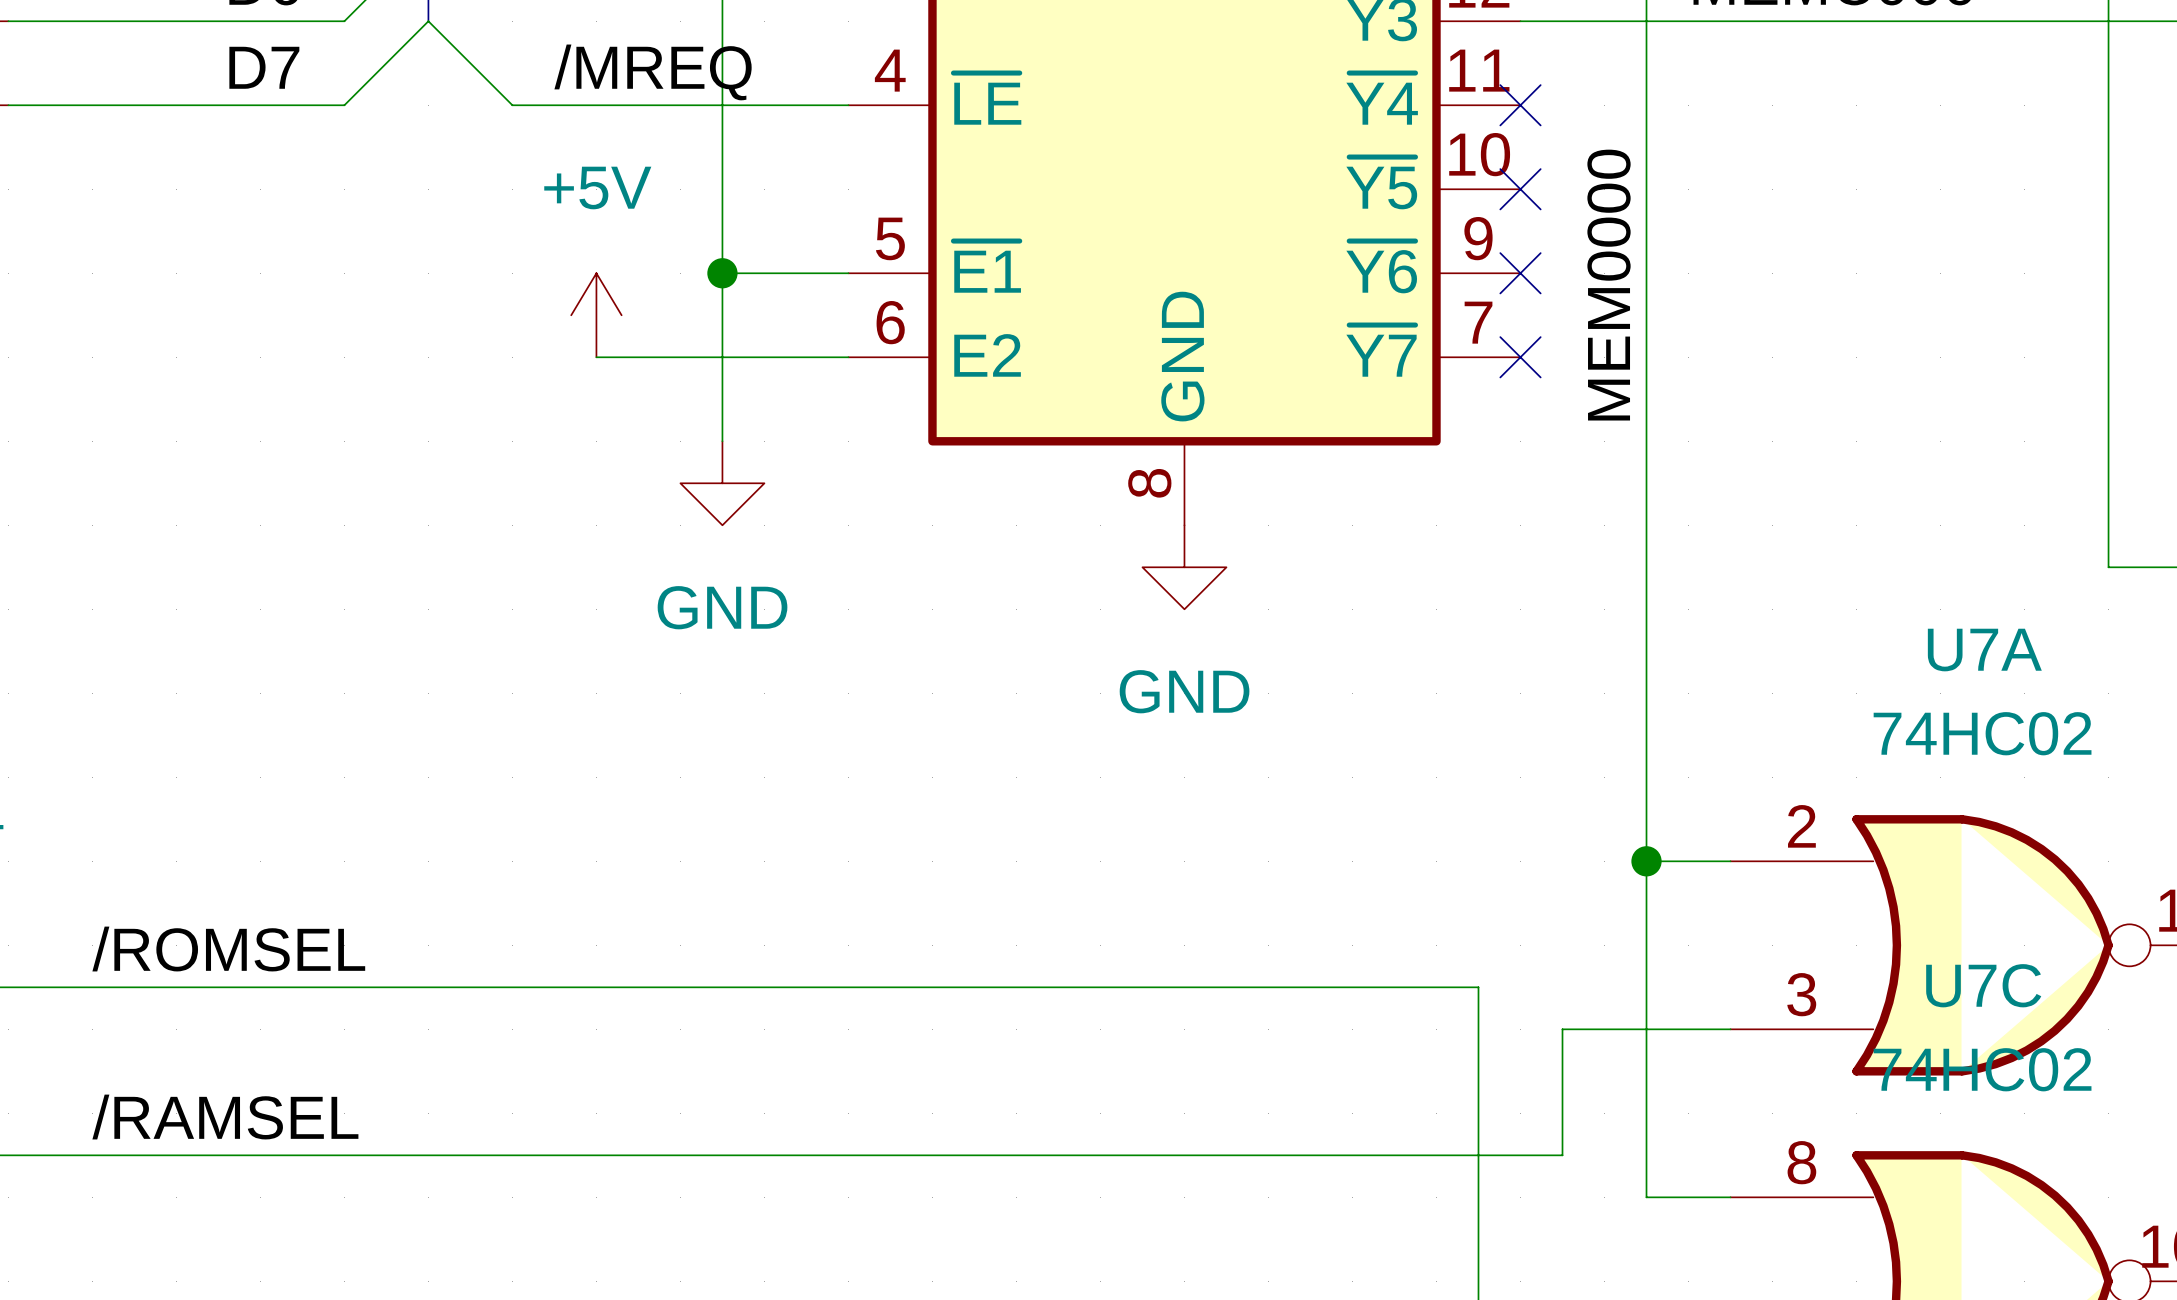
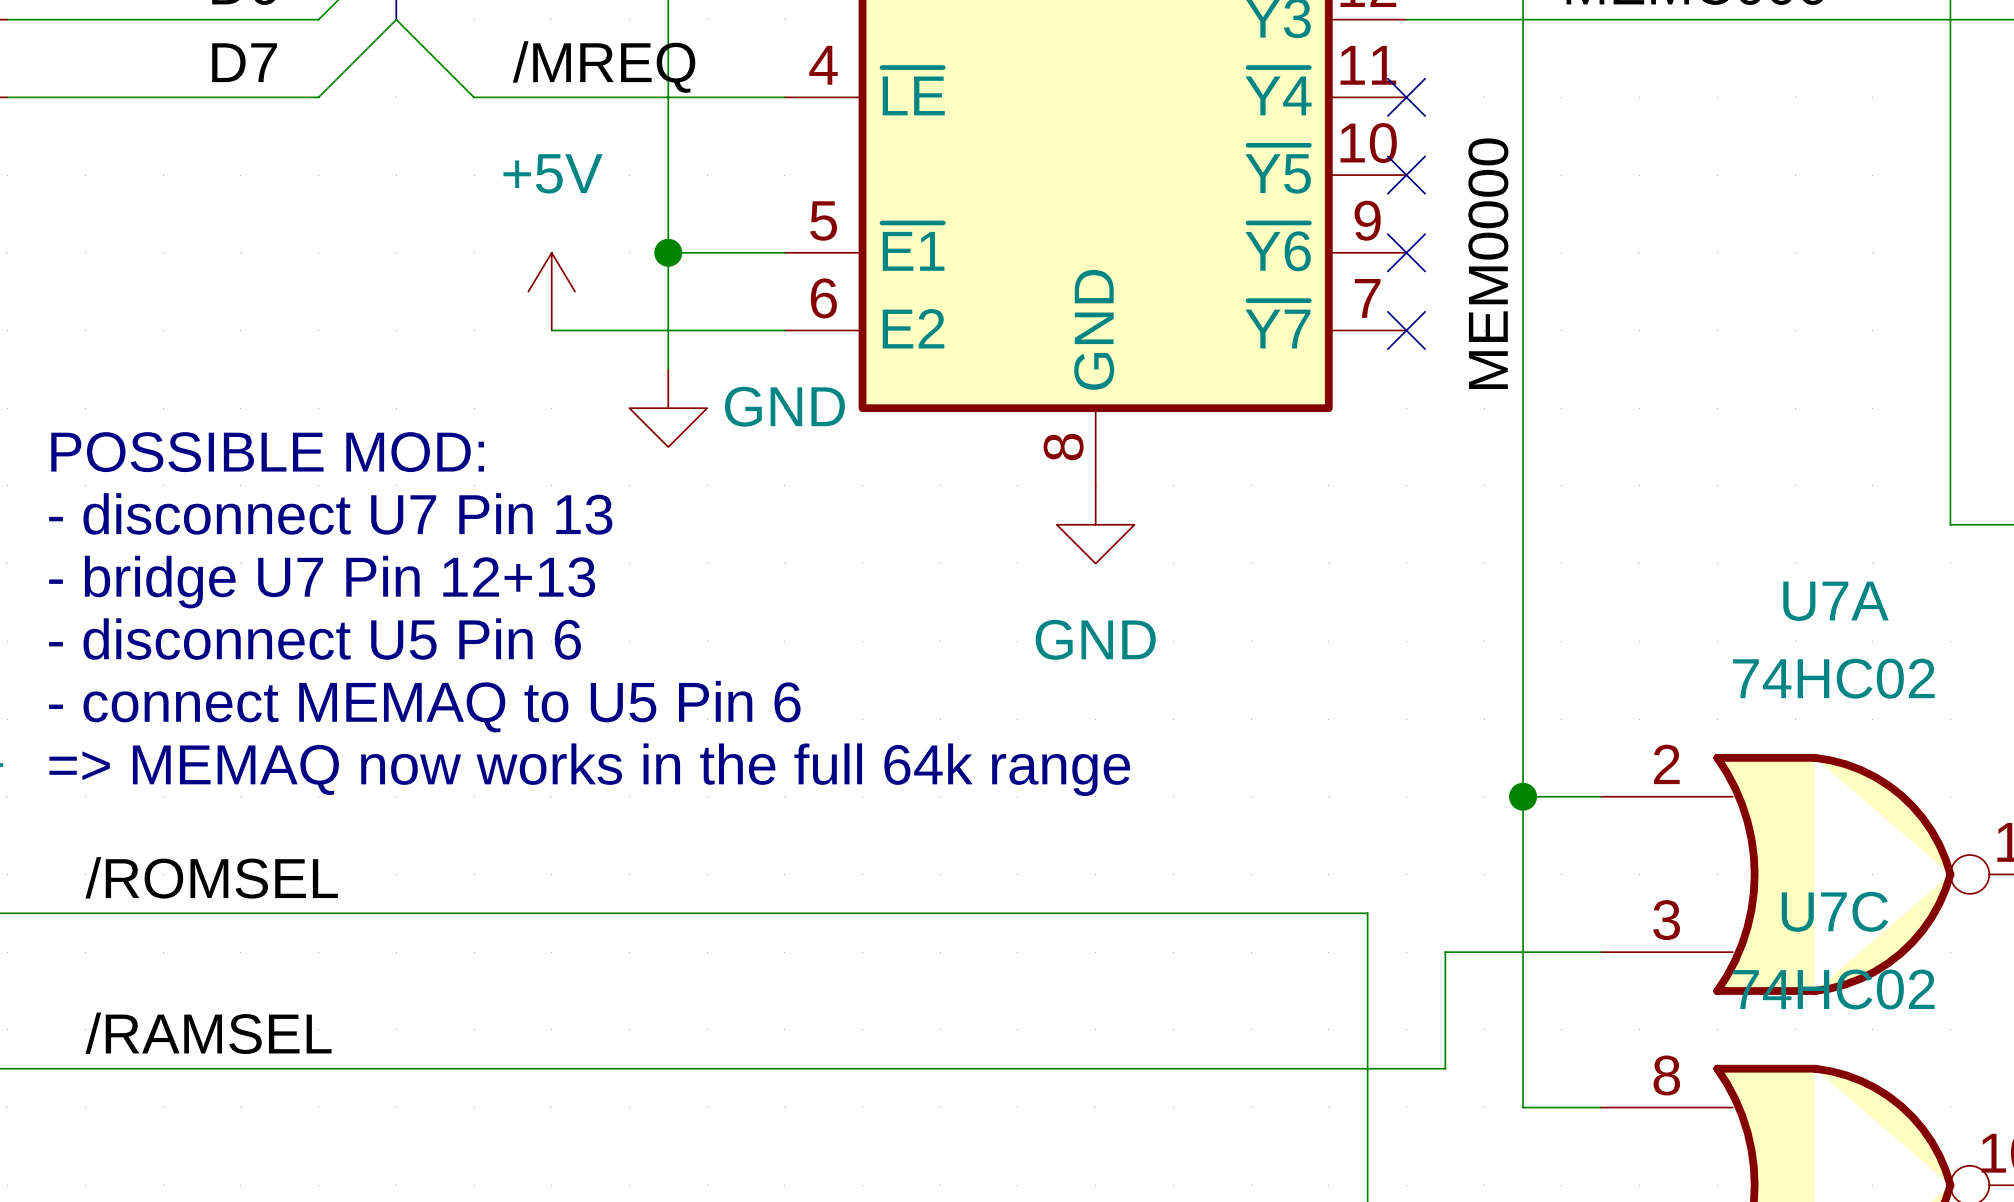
power symbol position: GND (722, 483) -> GND (668, 408)
text: none -> POSSIBLE MOD: (267, 452)
text: none -> - disconnect U7 Pin 13 (330, 513)
power symbol text position: GND (722, 607) -> GND (784, 406)
text: none -> - bridge U7 Pin 12+13 (322, 582)
text: none -> - disconnect U5 Pin 6 (315, 639)
text: none -> - connect MEMAQ to U5 Pin 6 (424, 706)
text: none -> => MEMAQ now works in the full 64k range (589, 769)

